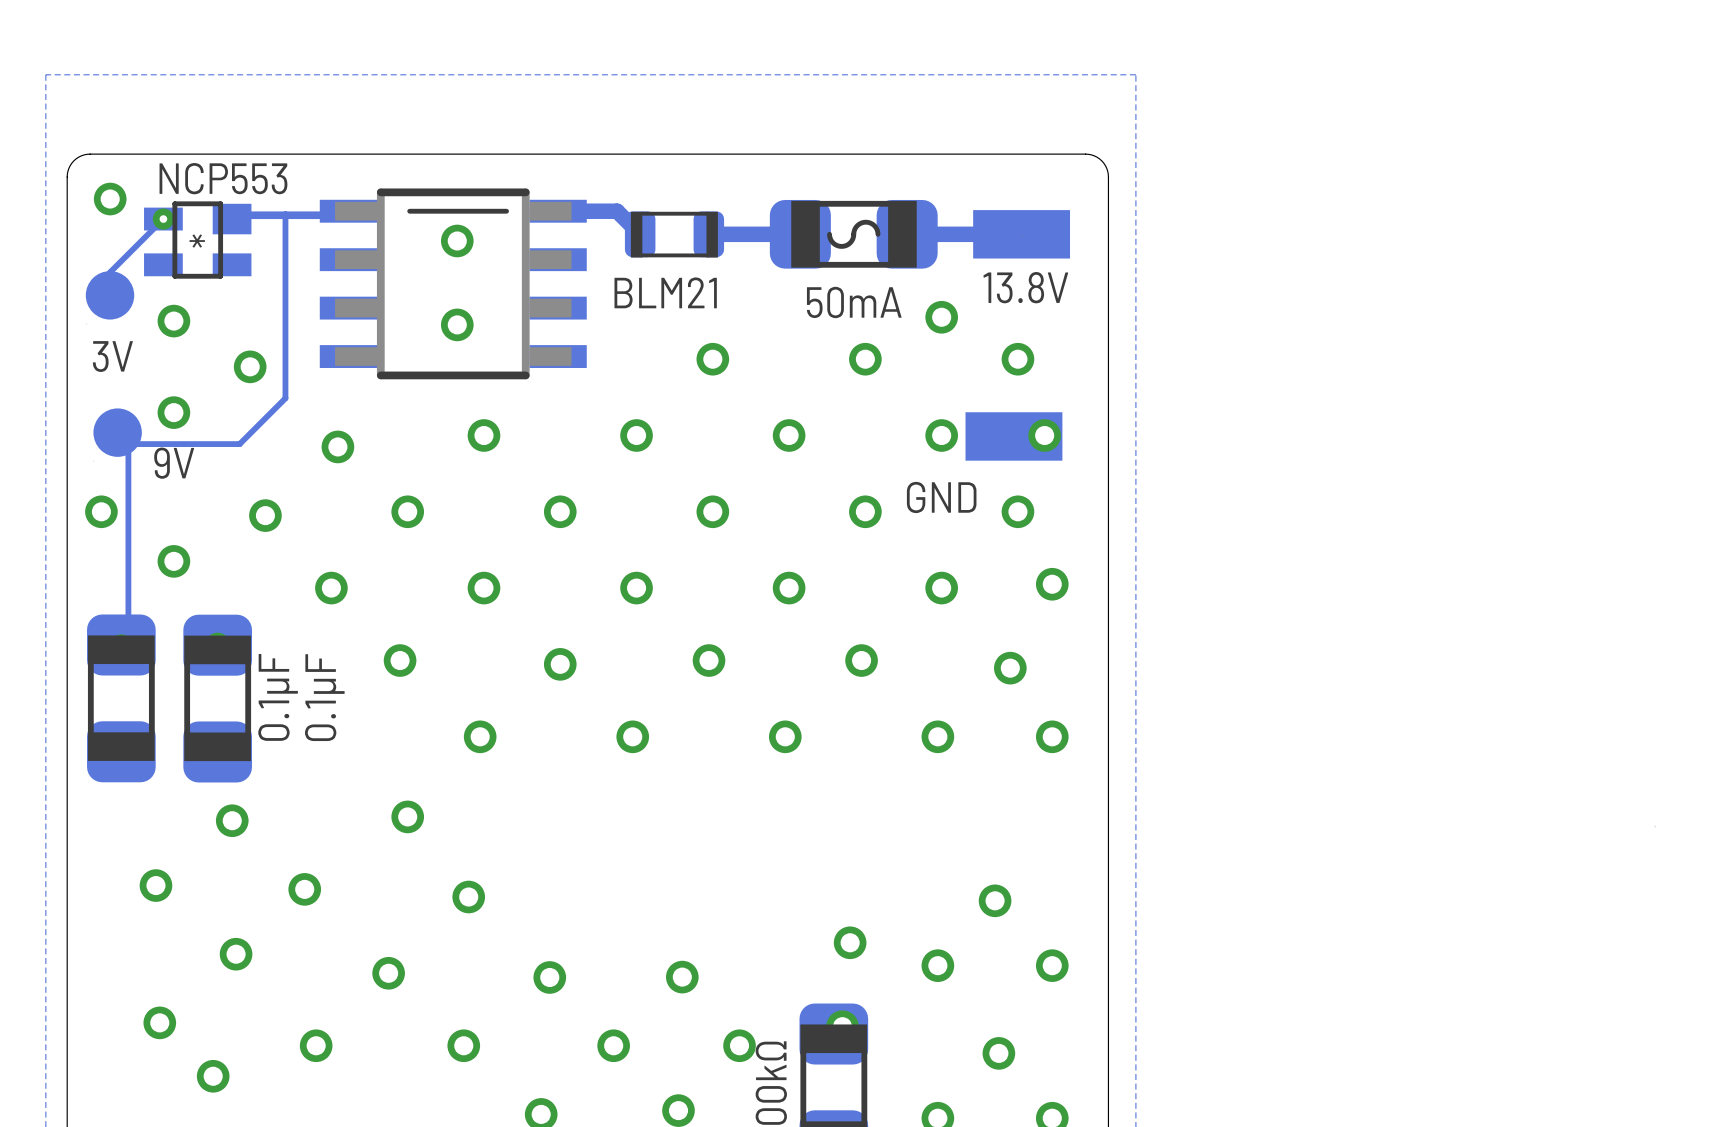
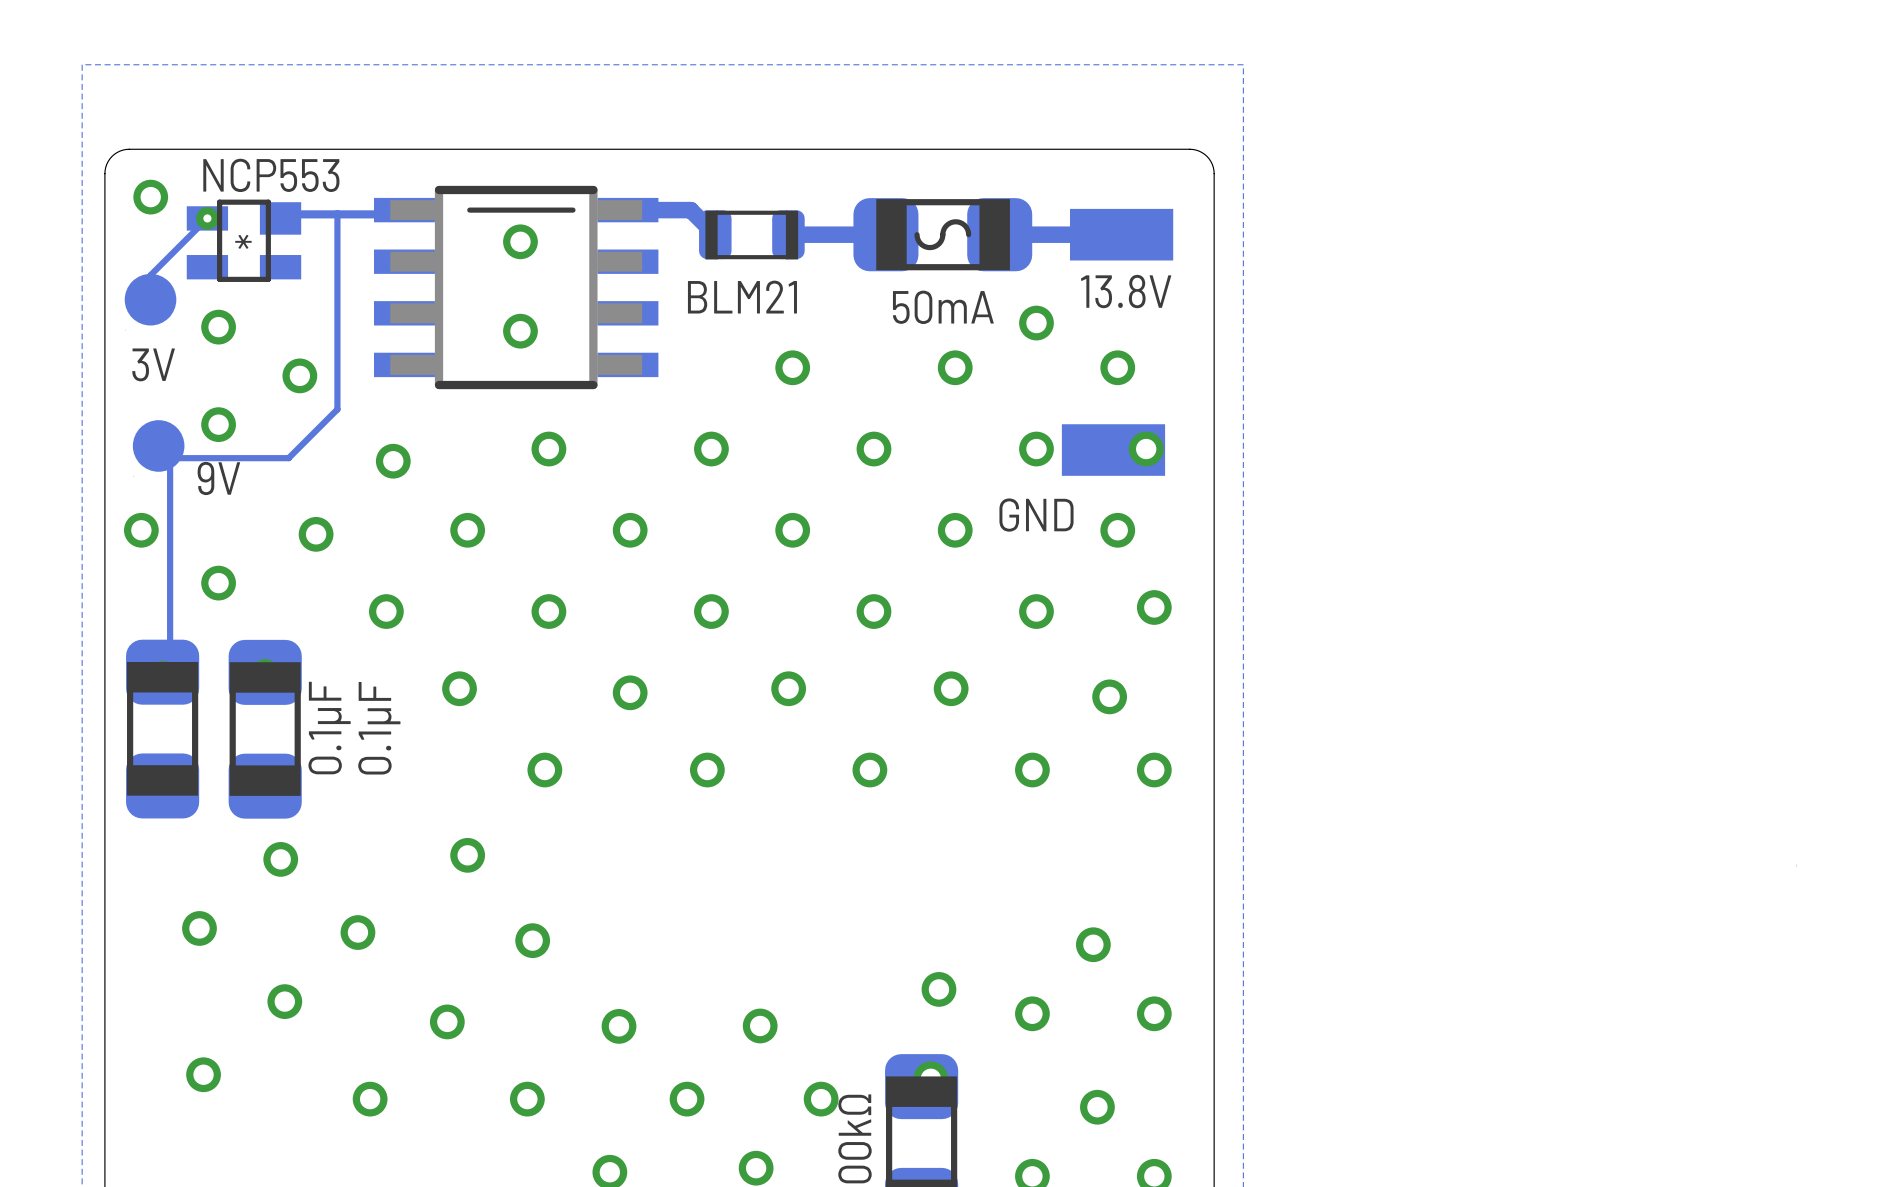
via: (213, 1076) -> none

